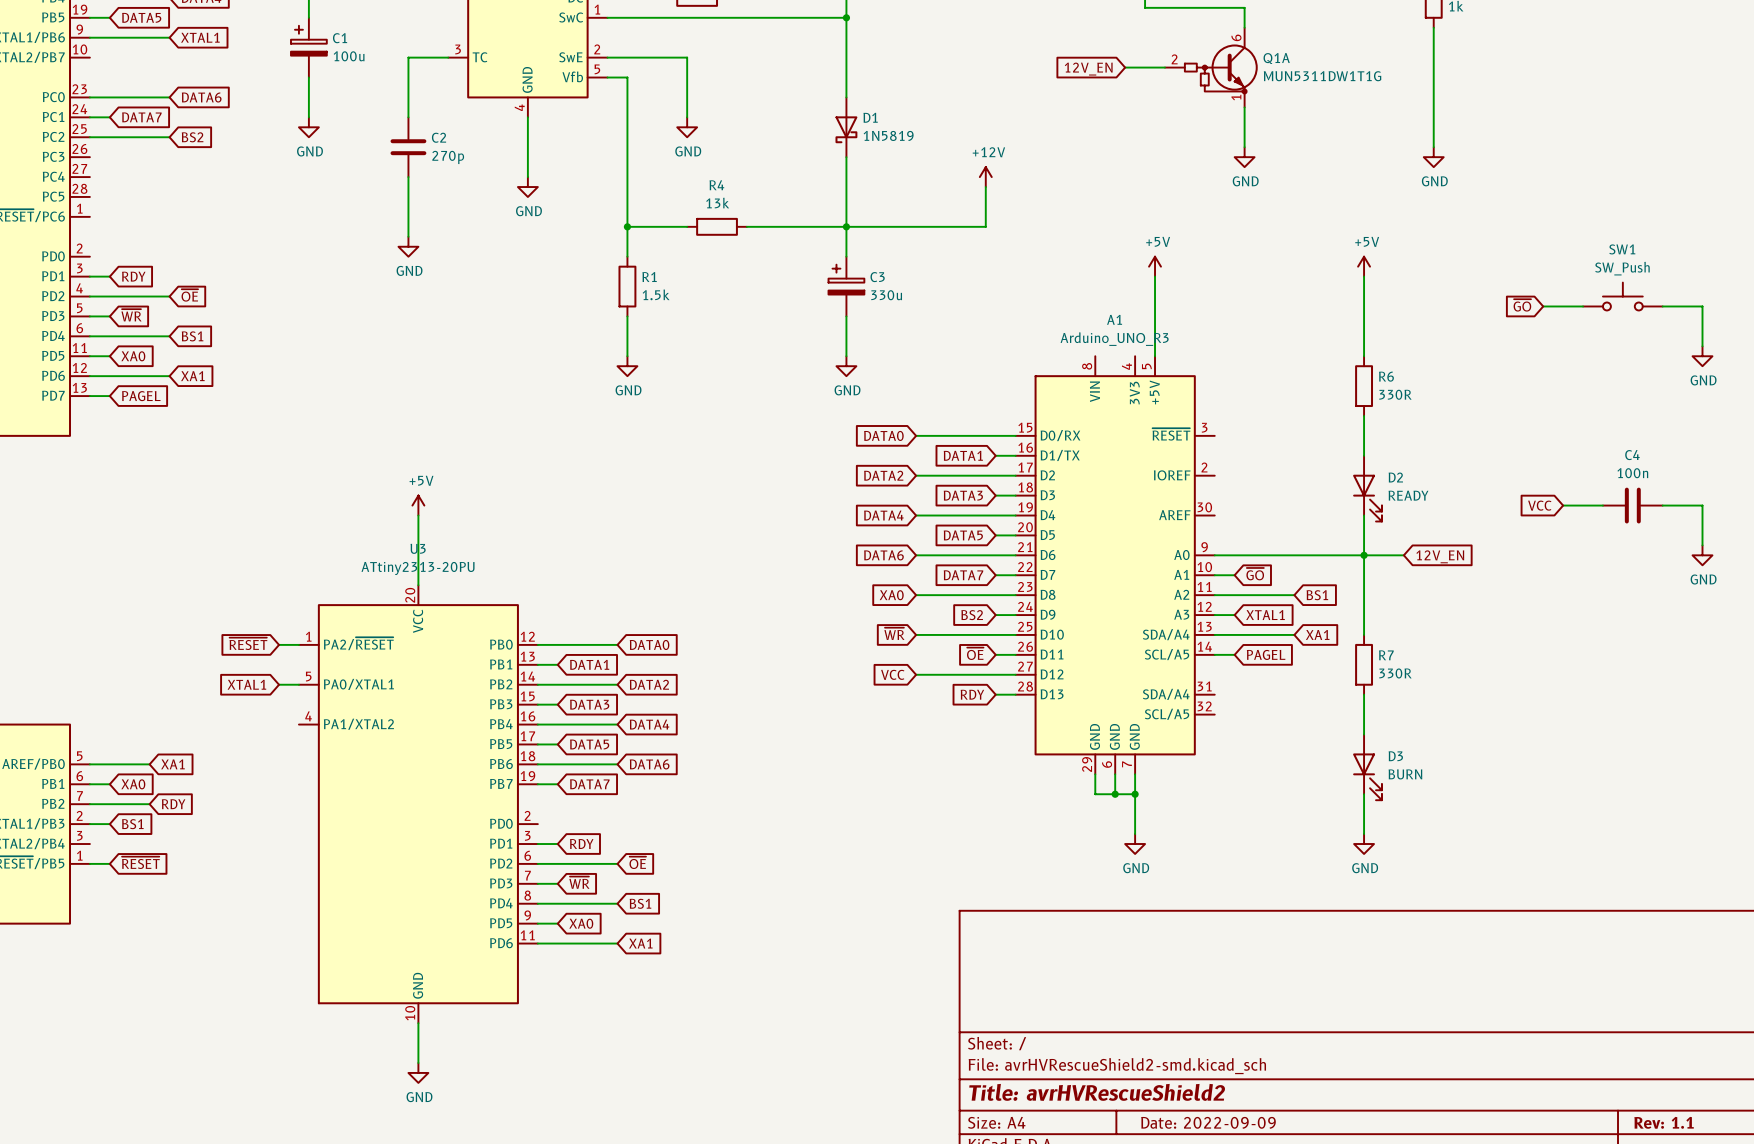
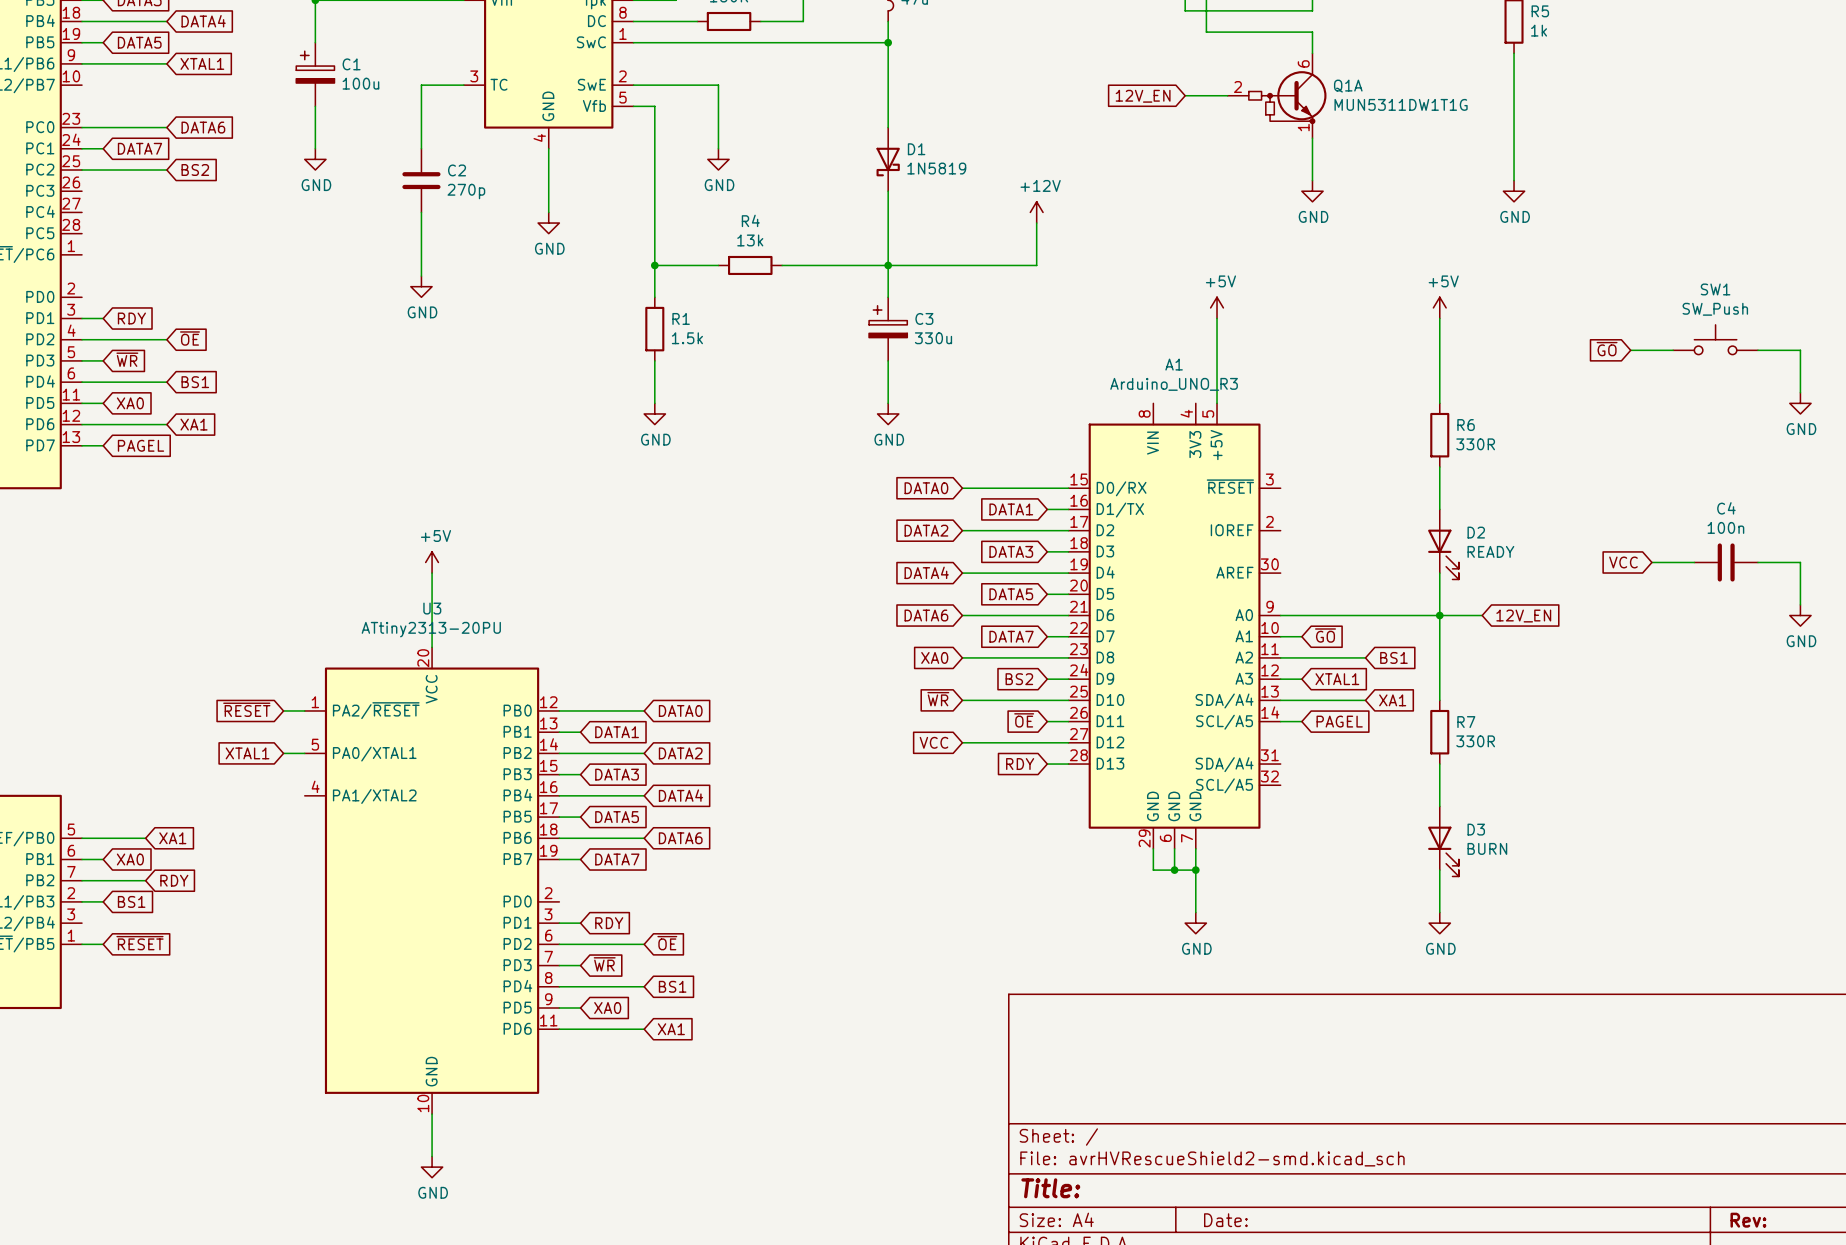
title block: Title: avrHVRescueShield2 (1097, 1092) -> Title: (1050, 1188)
title block: Date: 2022-09-09 (1208, 1122) -> Date: (1225, 1220)
title block: Rev: 1.1 (1664, 1122) -> Rev: (1748, 1220)

